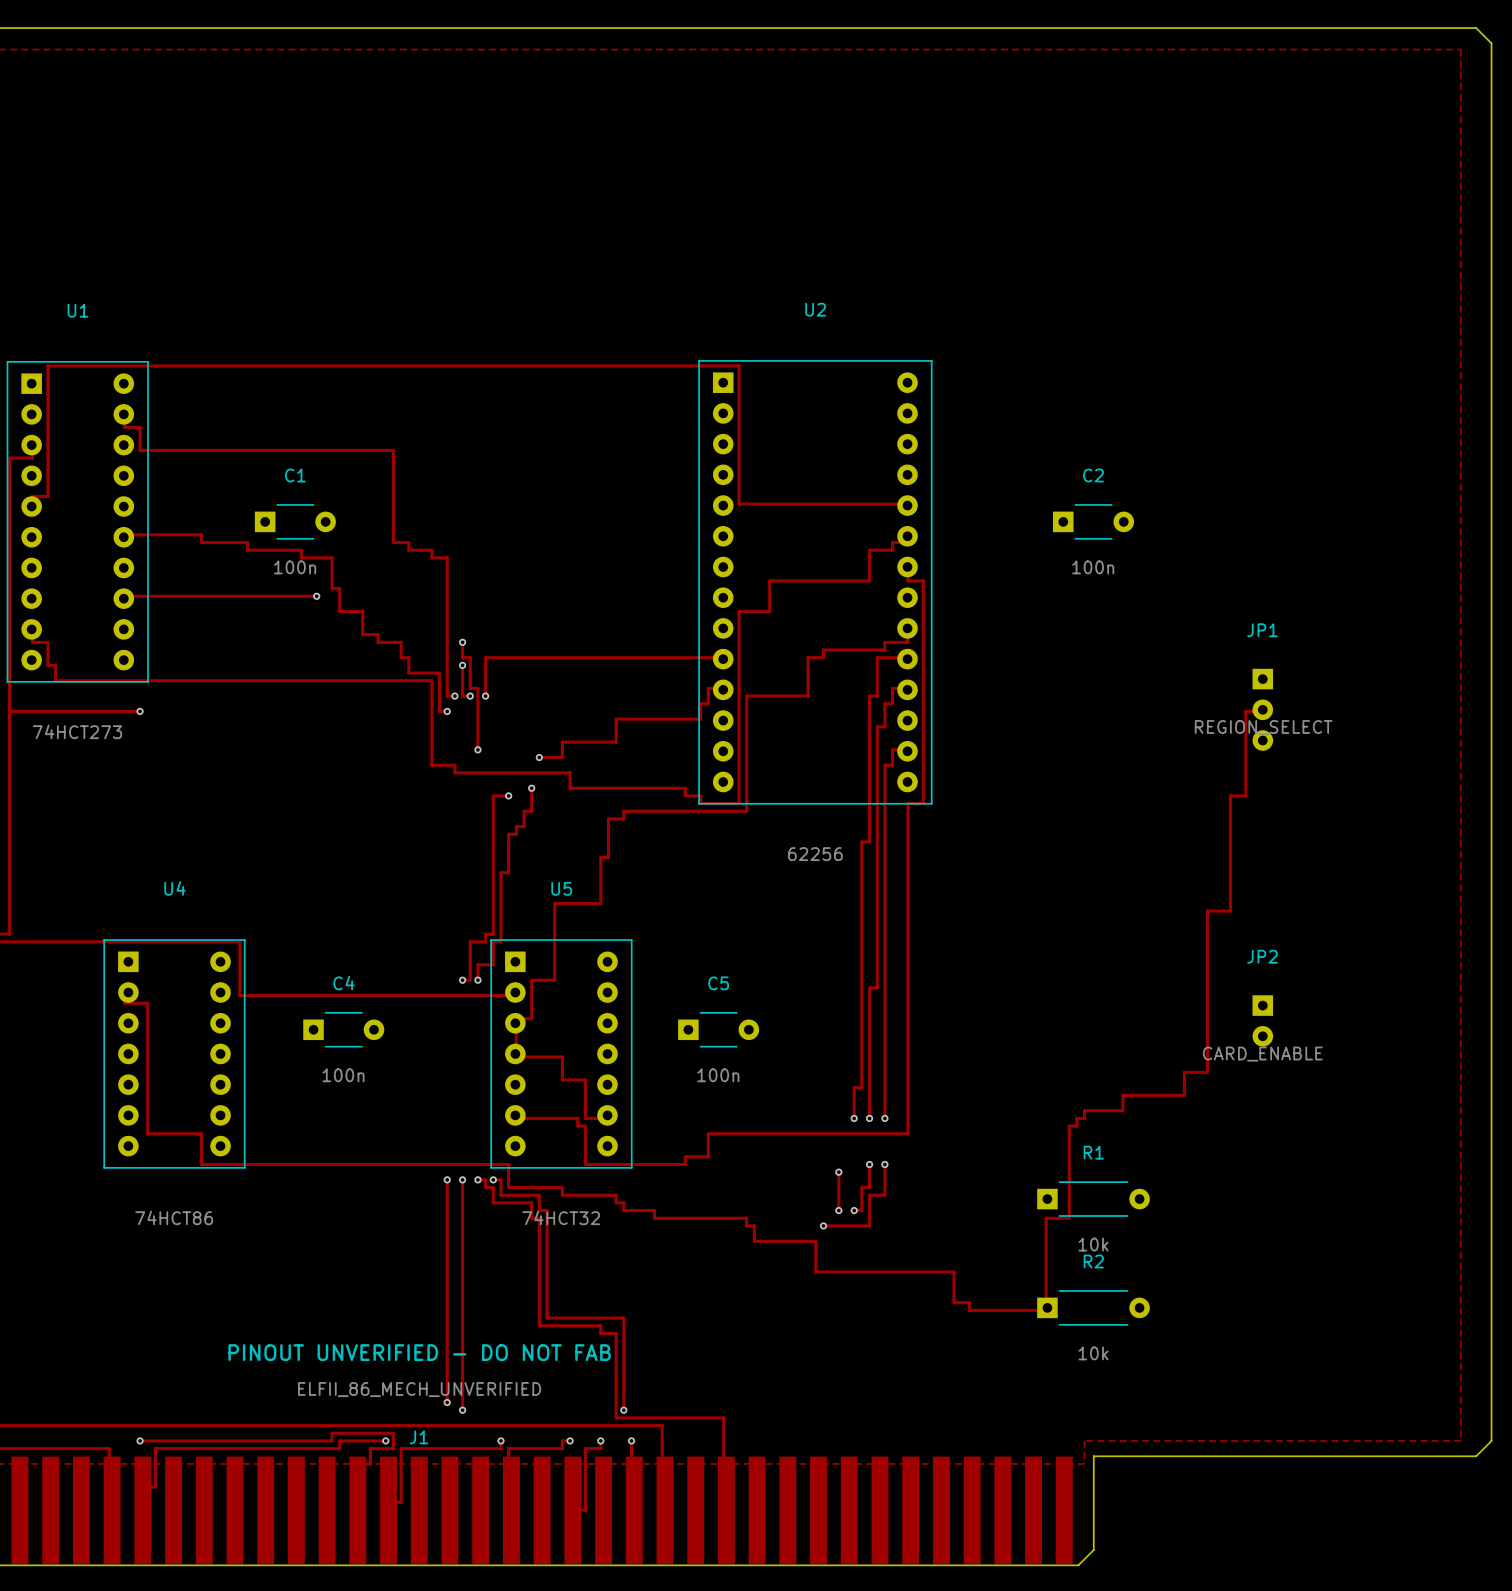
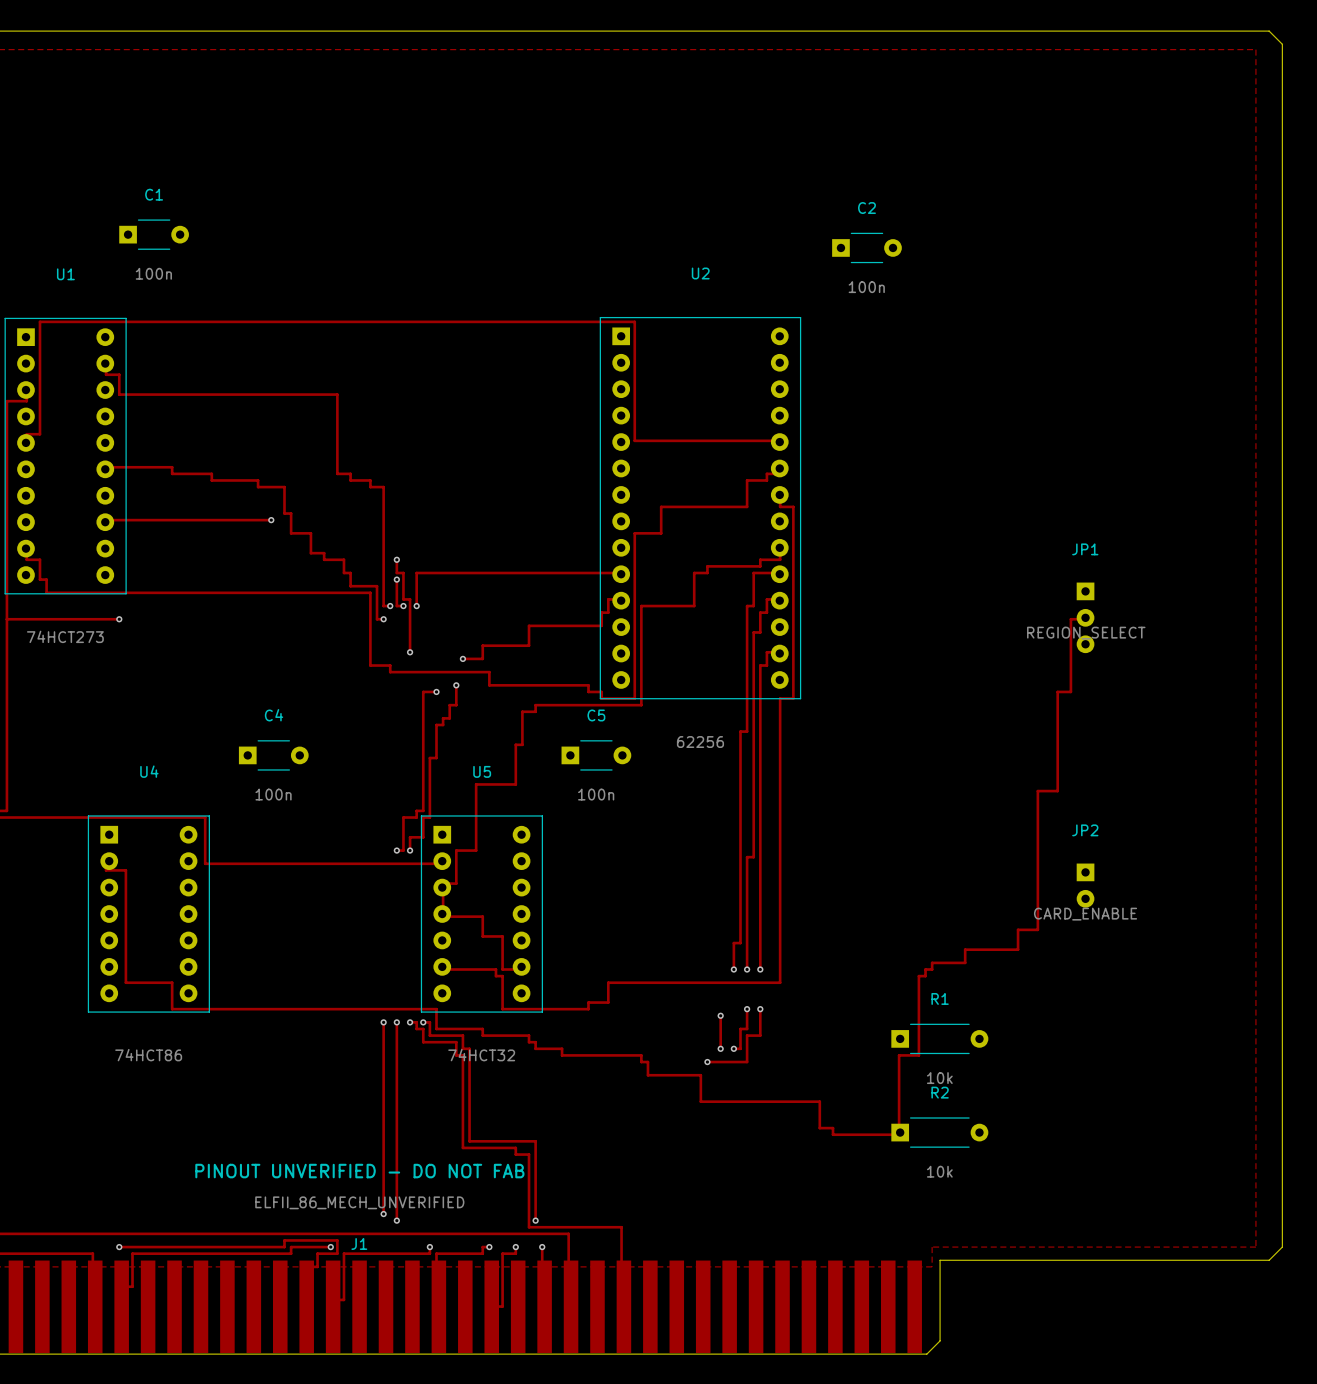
C1 position: (295, 521) -> (154, 234)
C2 position: (1093, 521) -> (866, 247)
C4 position: (343, 1029) -> (273, 755)
C5 position: (718, 1029) -> (596, 755)

